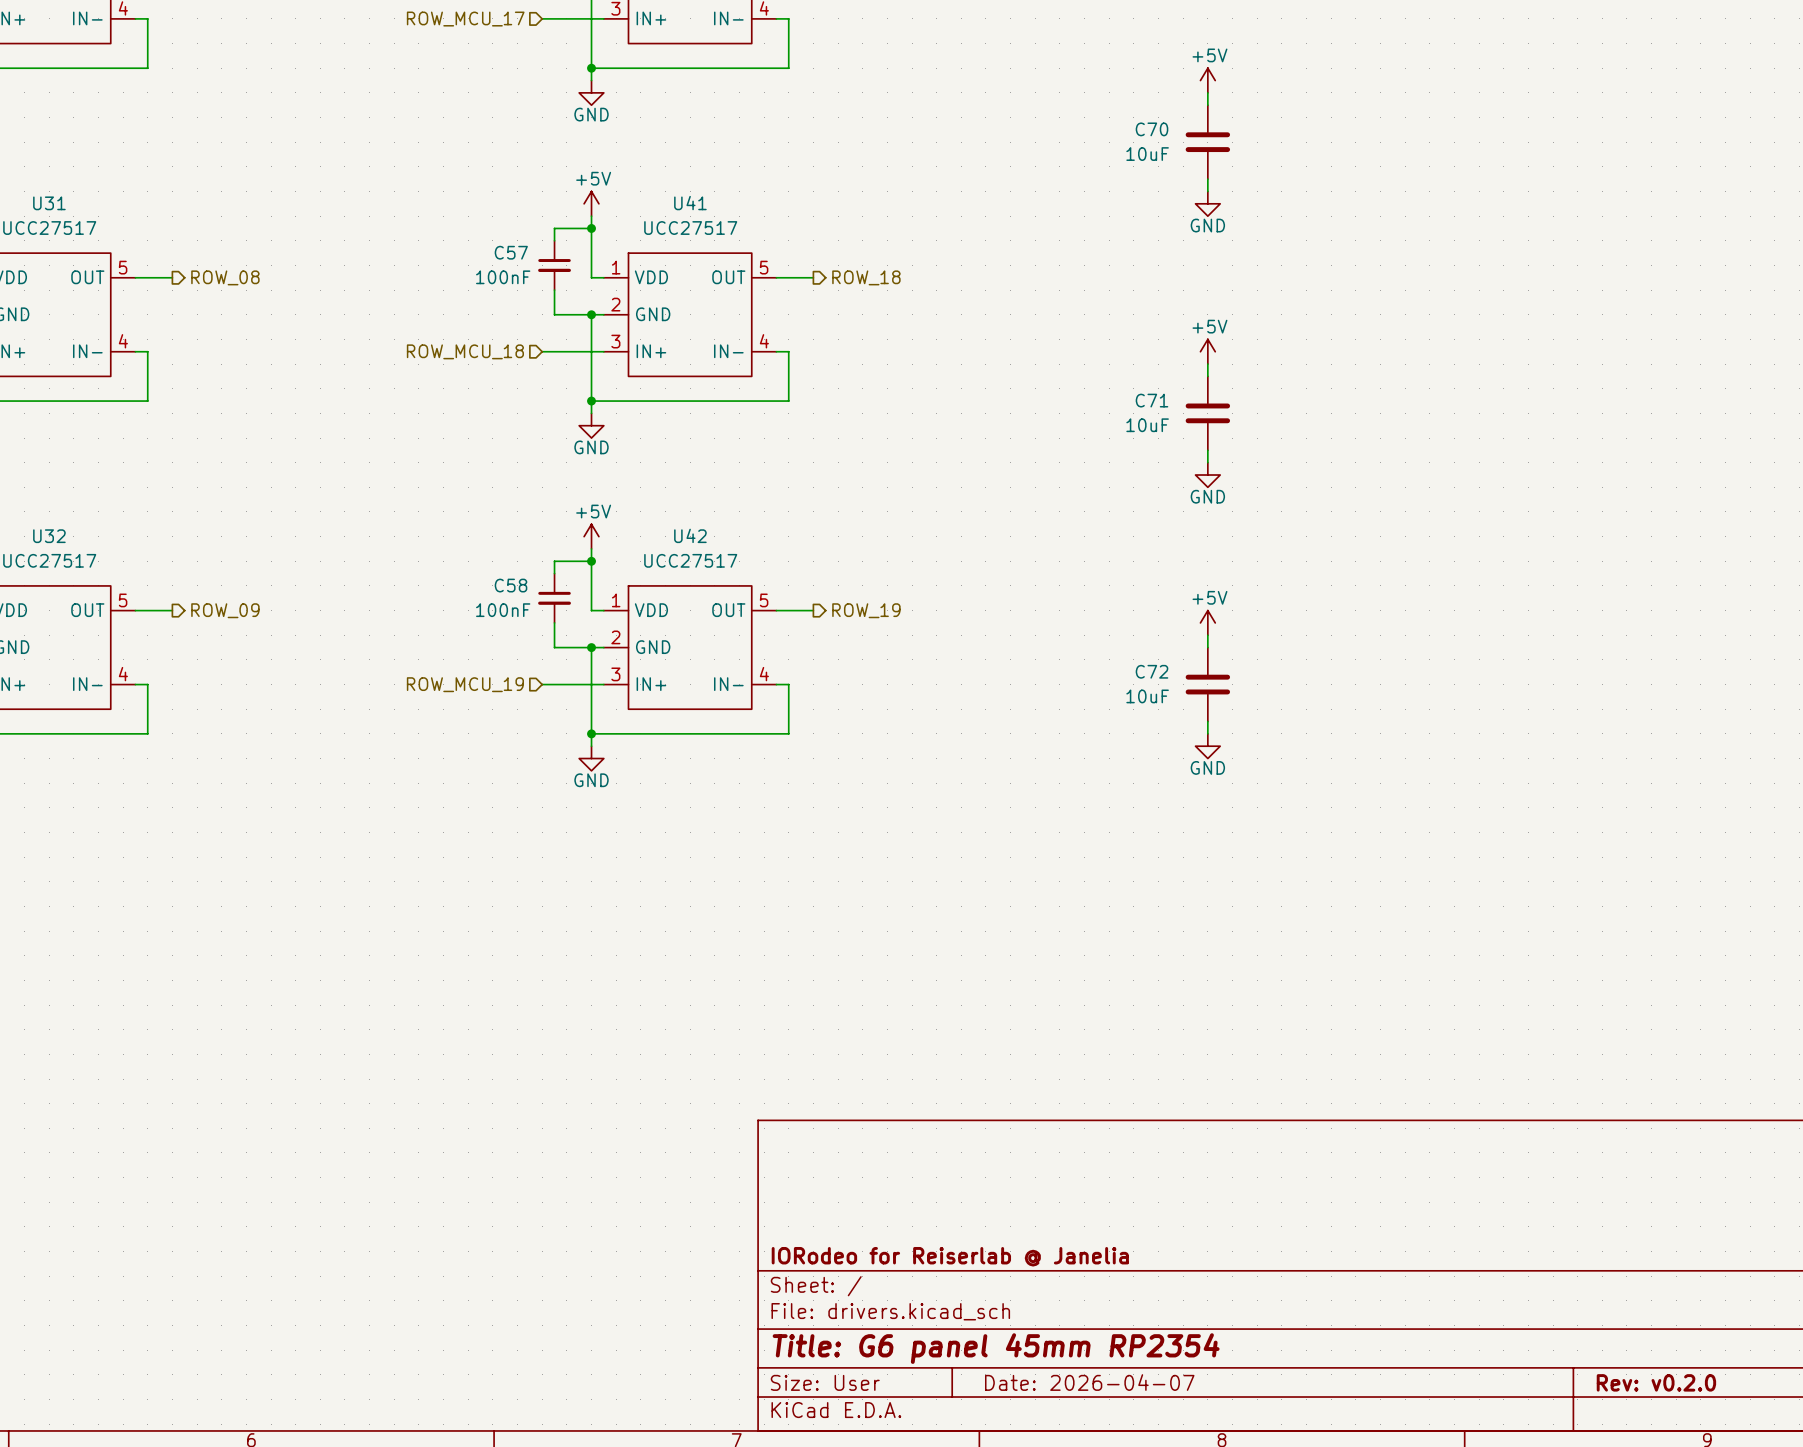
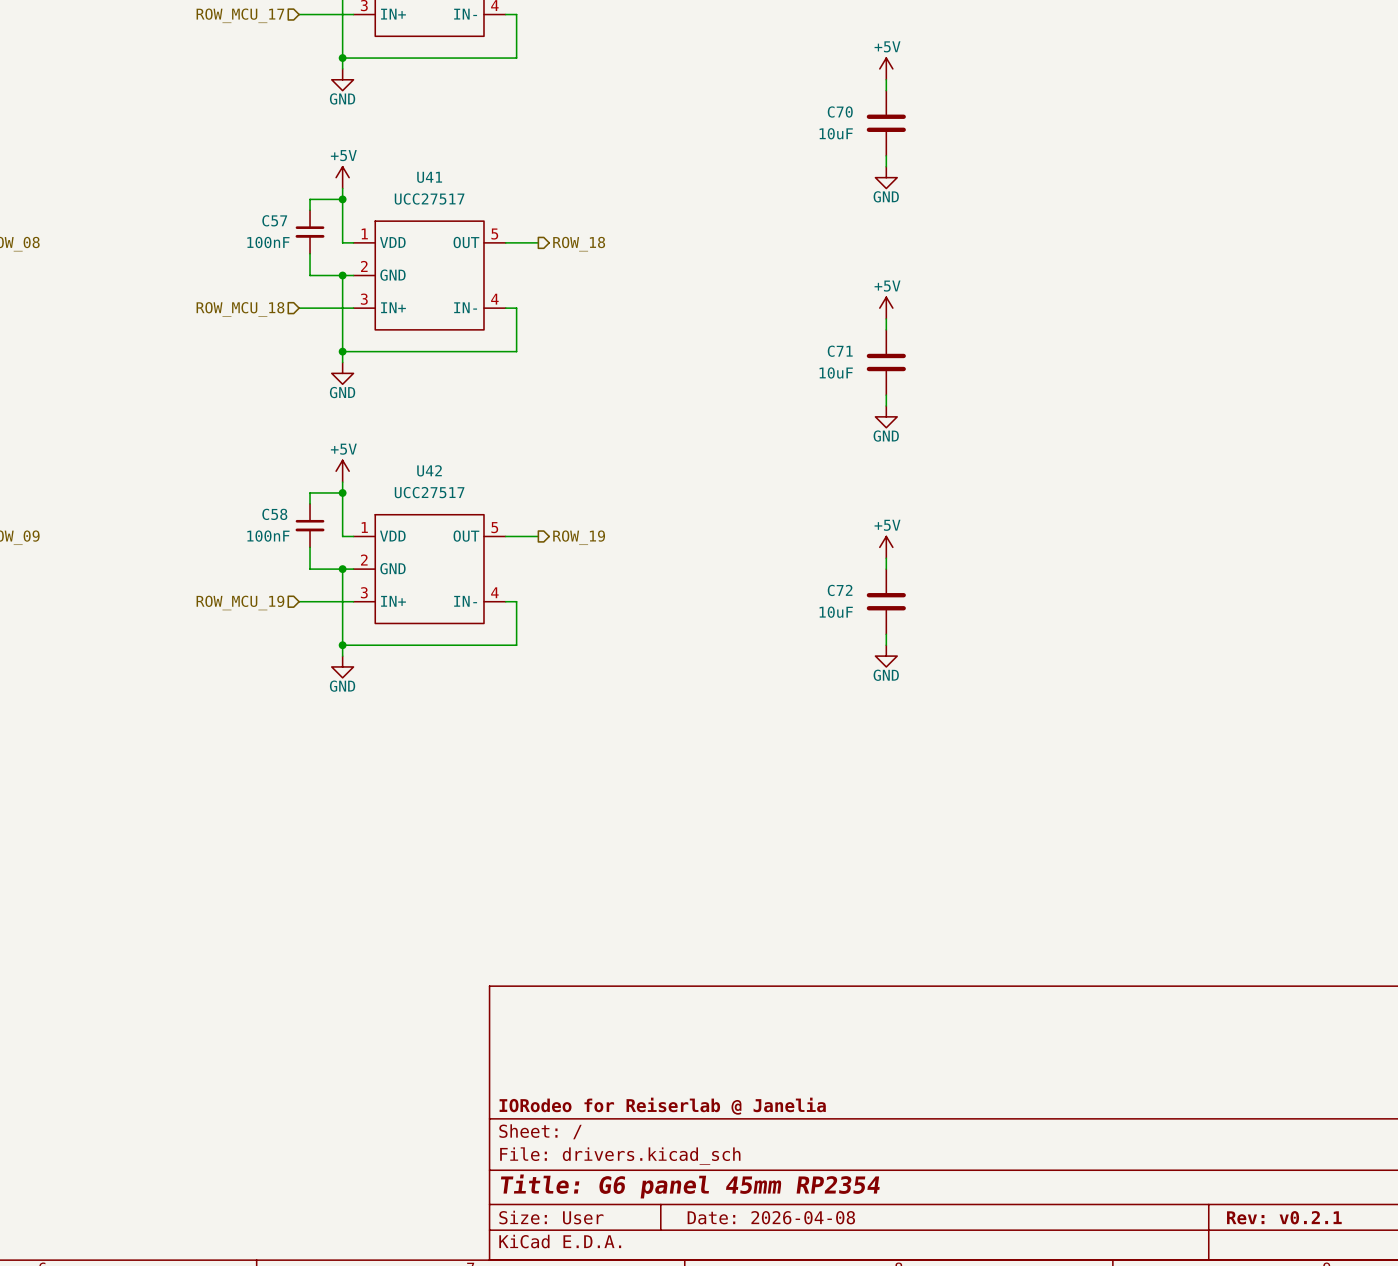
title block: Date: 2026-04-07 (1089, 1382) -> Date: 2026-04-08 (771, 1217)
title block: Rev: v0.2.0 (1656, 1382) -> Rev: v0.2.1 (1284, 1217)

